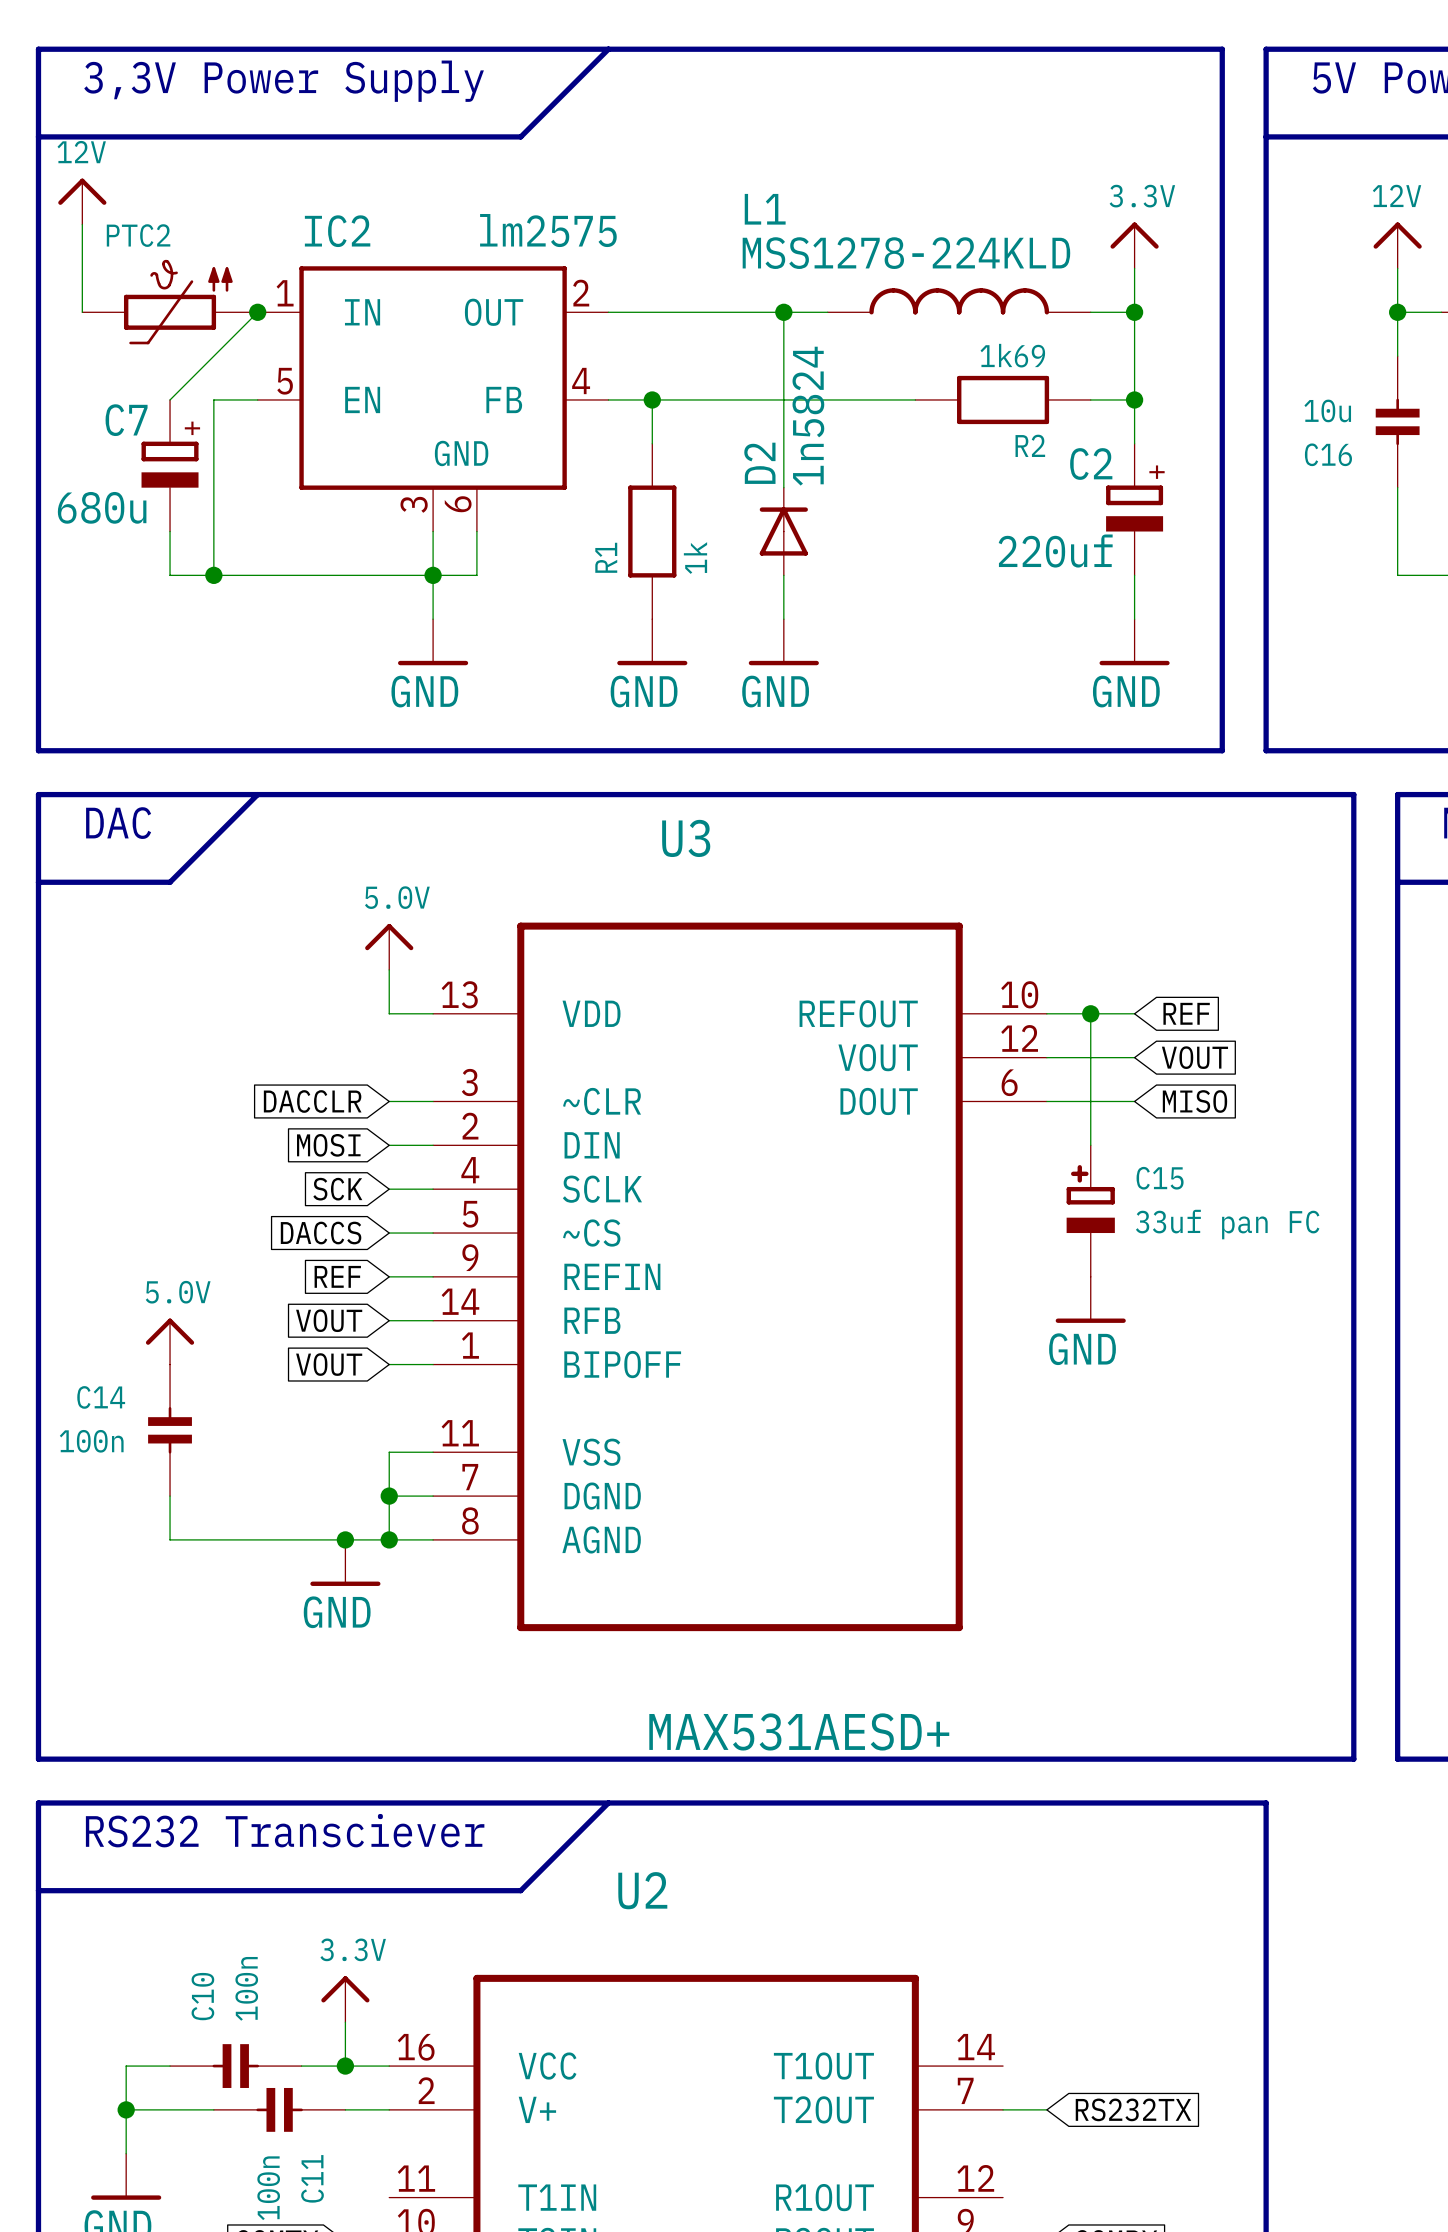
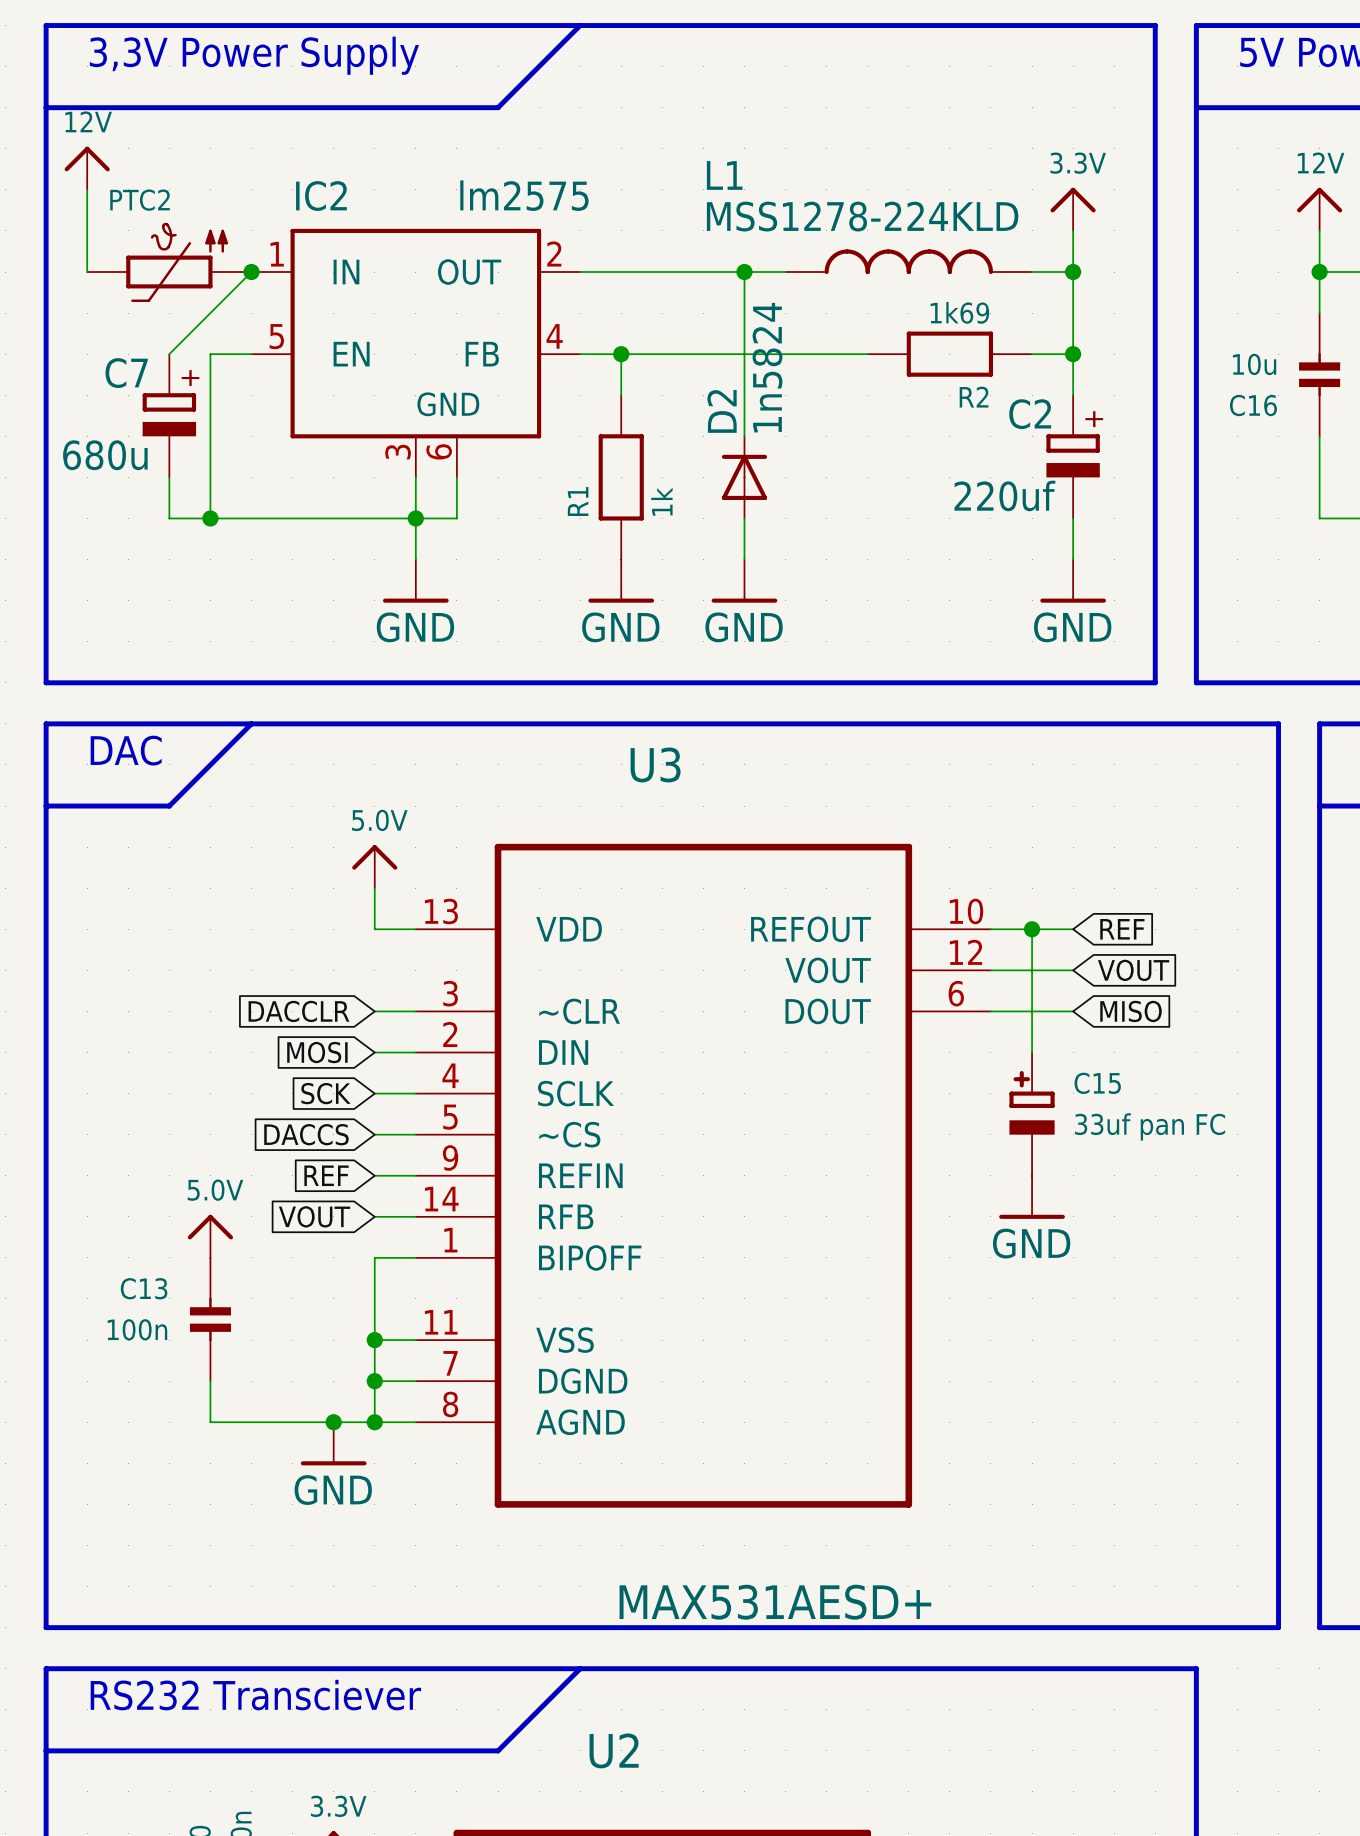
power symbol position: 5.0V (170, 1341) -> 5.0V (210, 1236)
global label: VOUT (329, 1364) -> none
wire: none -> (374, 1257) (374, 1340)
C14: 100n (170, 1430) -> none
C13: none -> 100n (210, 1319)
junction: none -> (374, 1340)
wire: (170, 1496) (170, 1539) (213, 1539) -> (210, 1381) (210, 1422)

